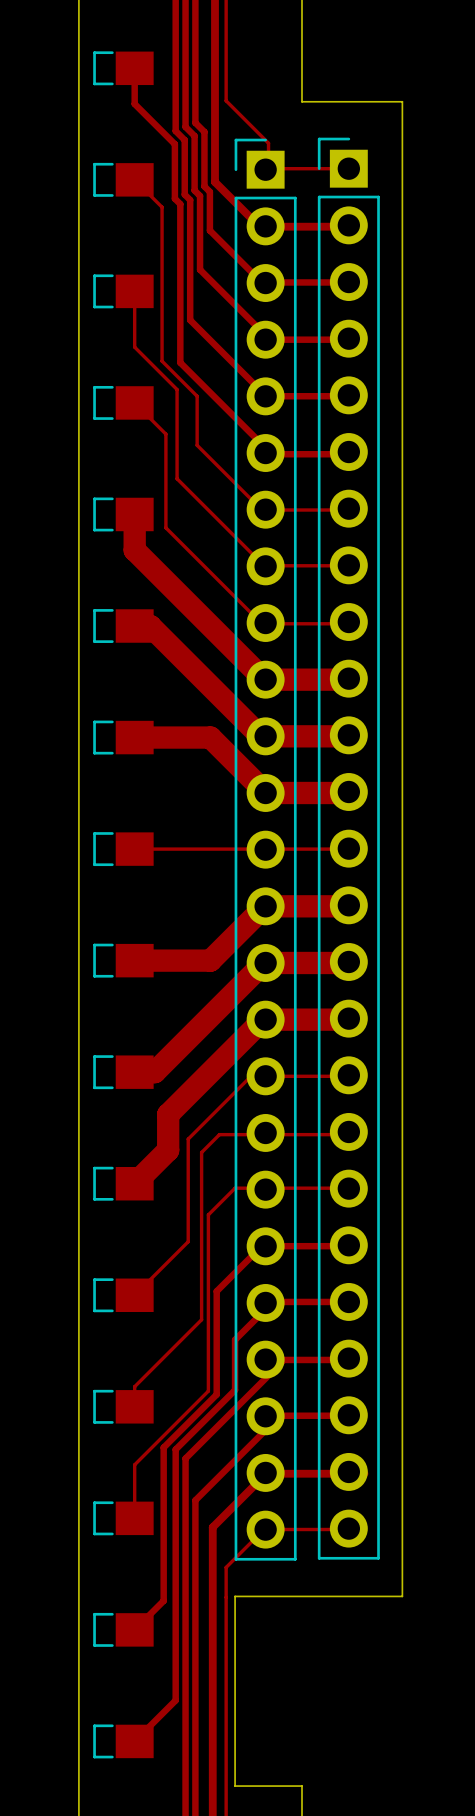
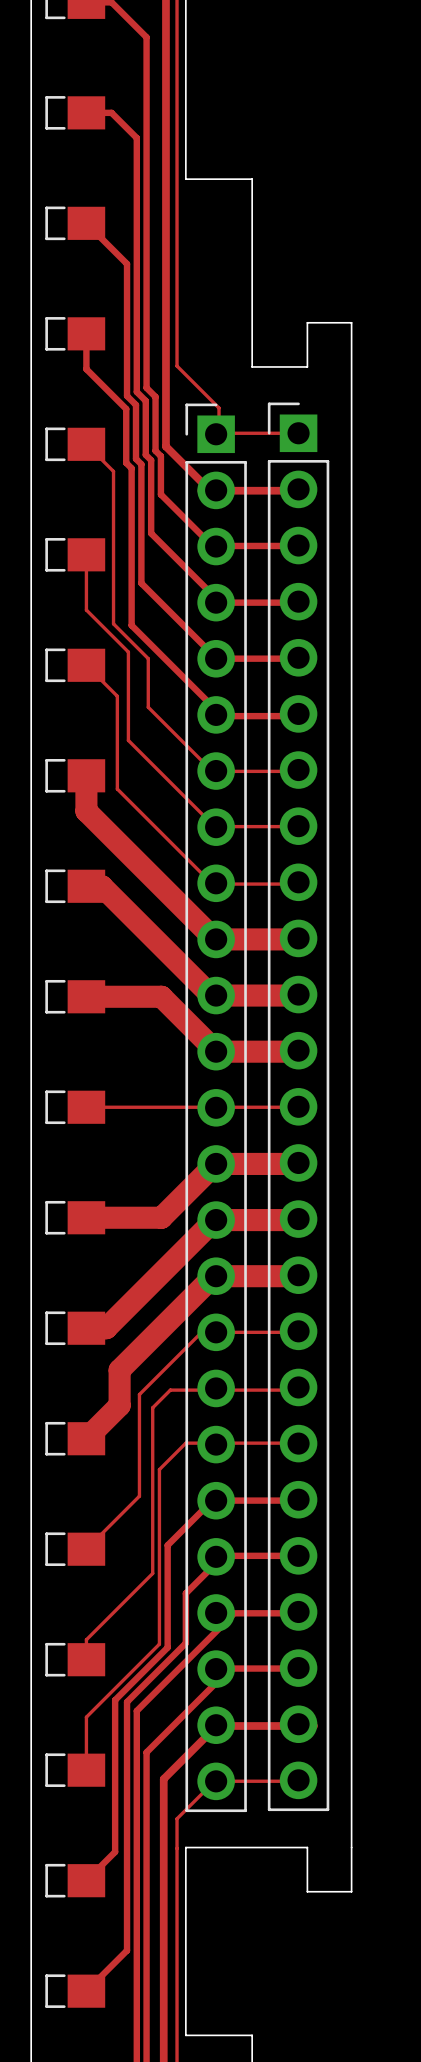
board edge: (357, 101) (402, 101) -> (307, 366) (307, 322) (351, 322) (351, 366)
board edge: (357, 1596) (402, 1596) -> (307, 1847) (307, 1891) (351, 1891) (351, 1847)

